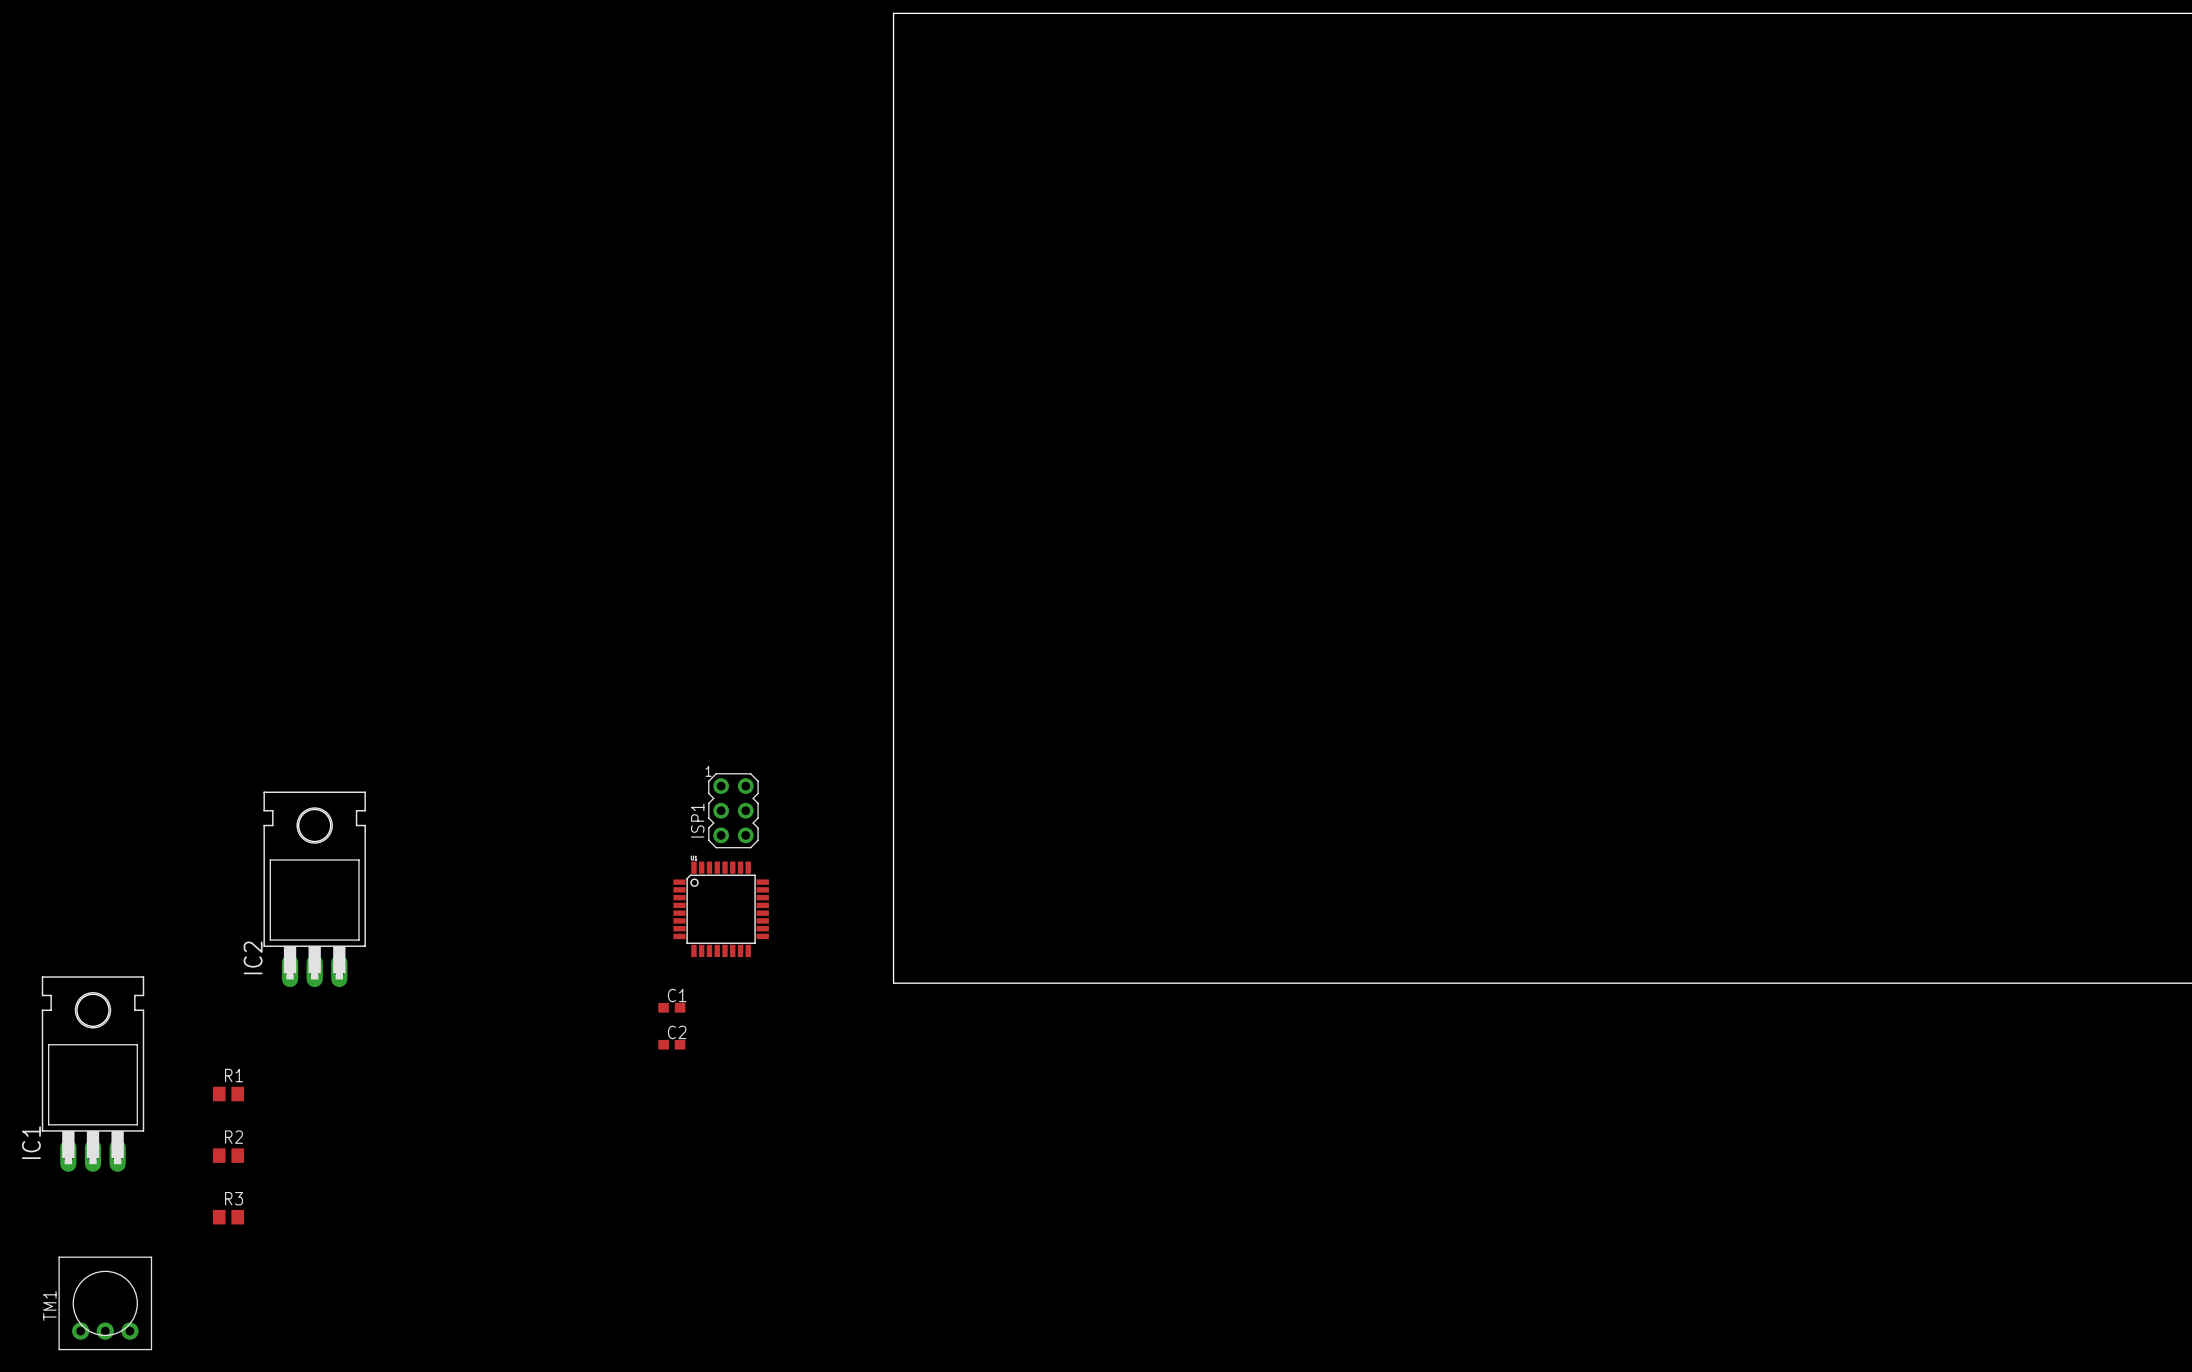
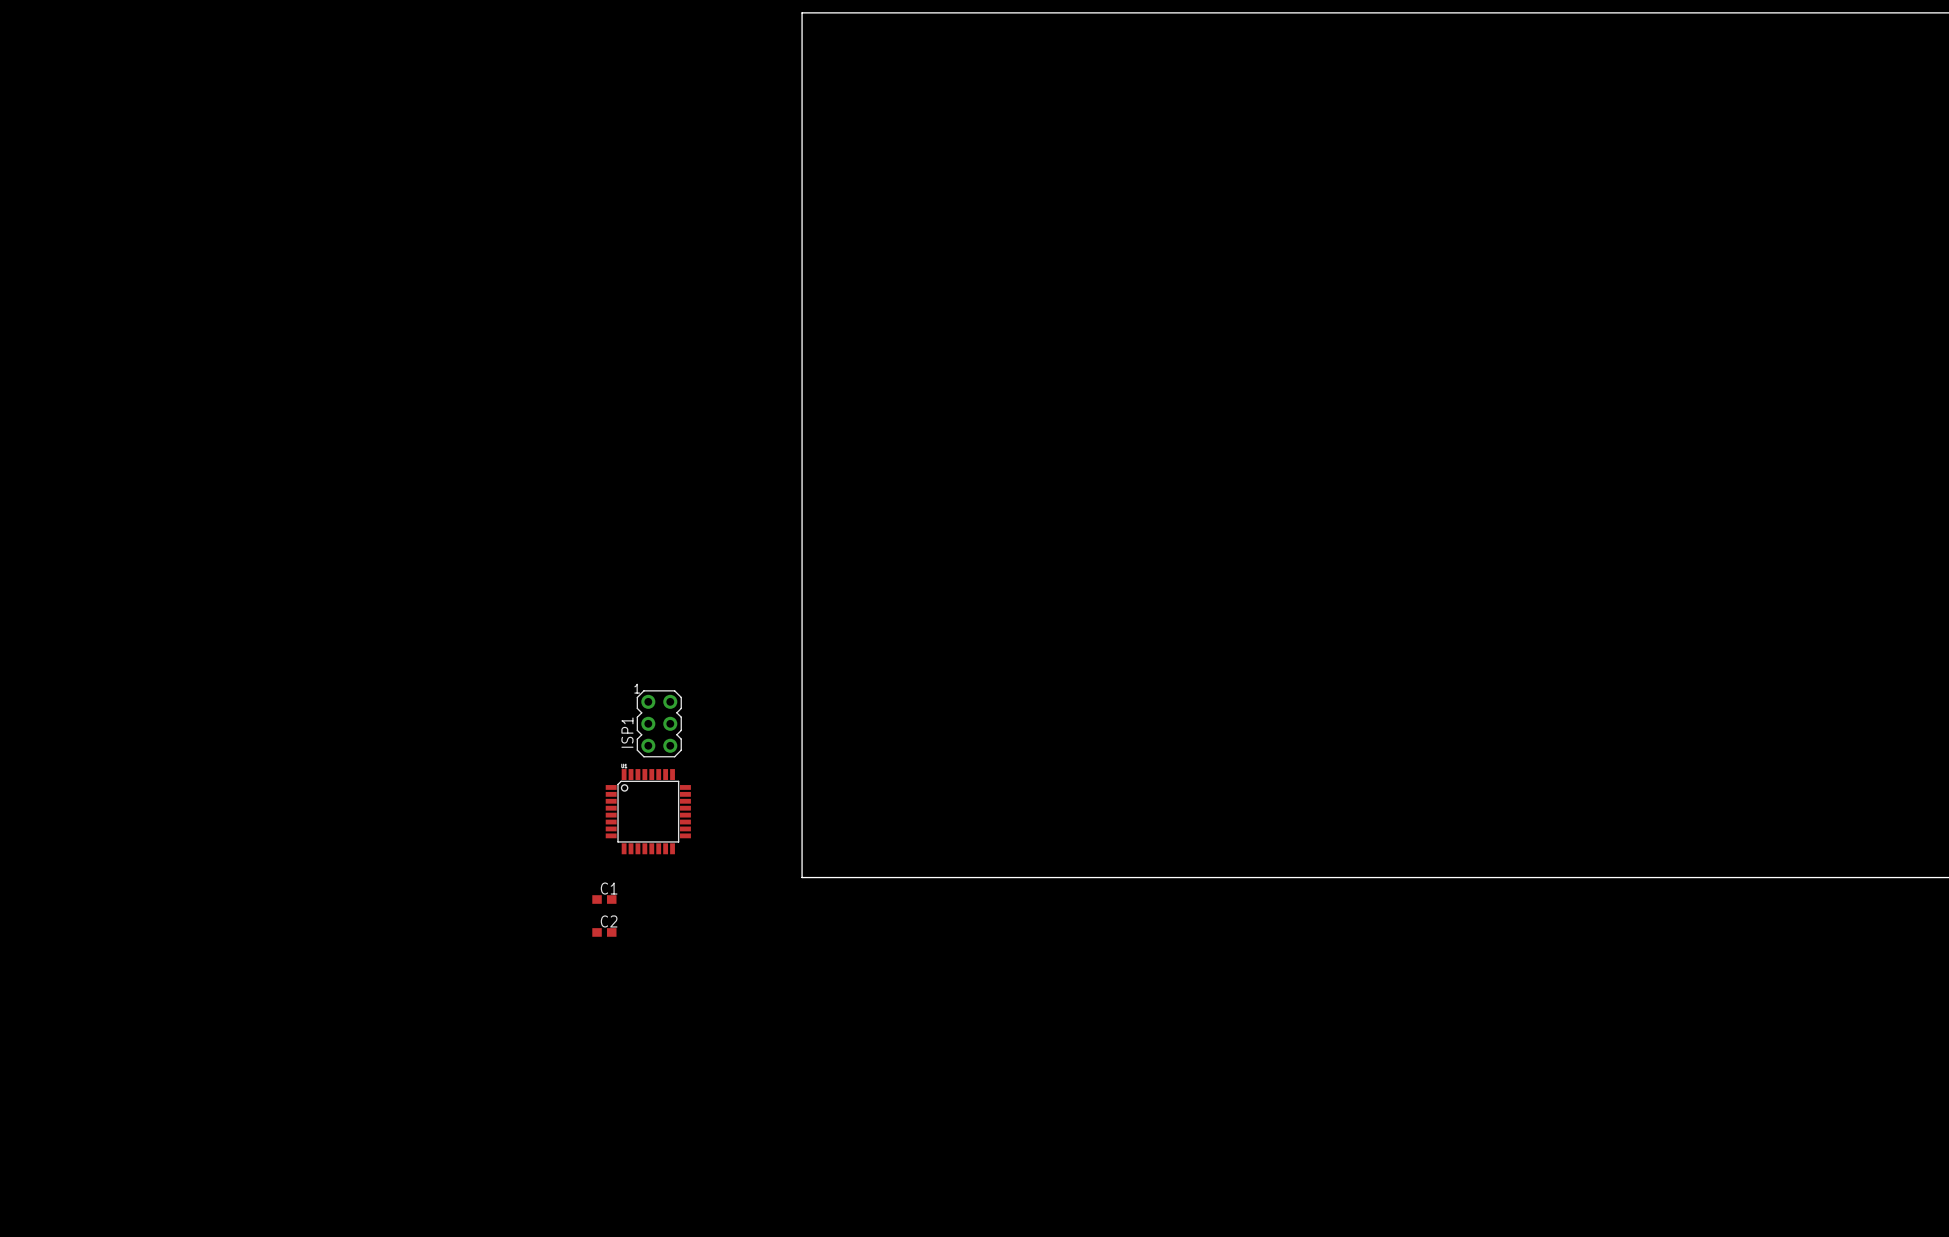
IC2: (314, 889) -> none
IC1: (92, 1074) -> none
R1: (228, 1094) -> none
R2: (228, 1155) -> none
R3: (228, 1217) -> none
TM1: (105, 1303) -> none

